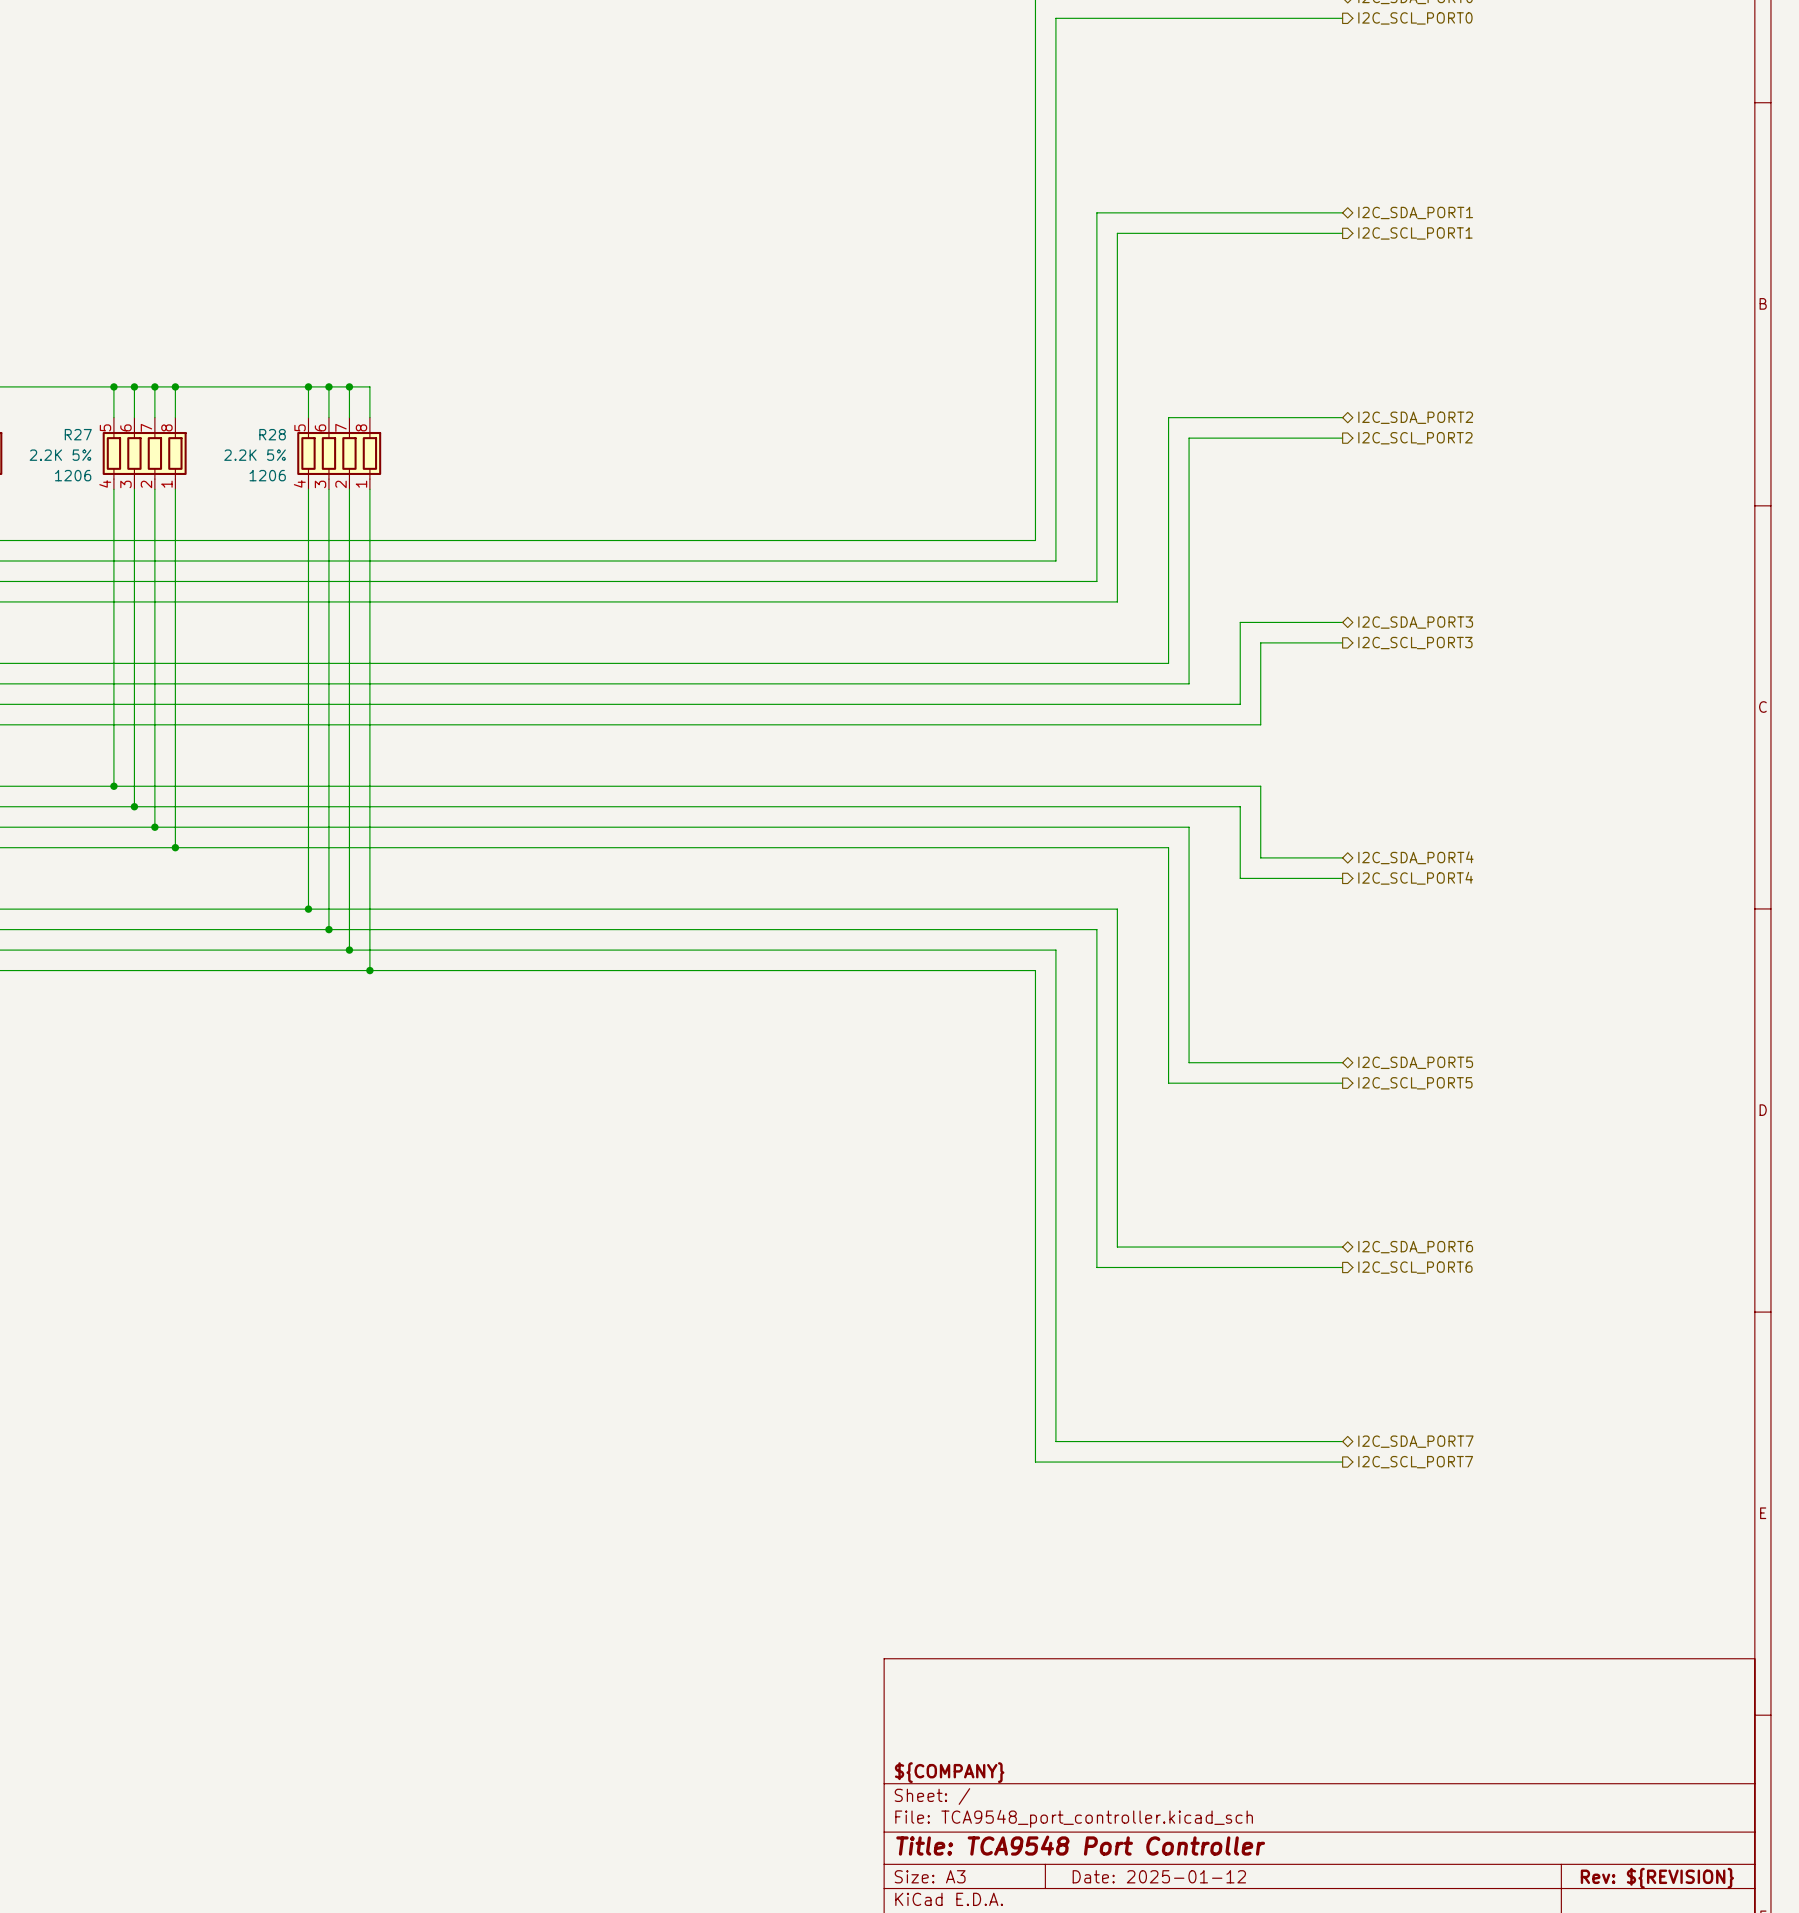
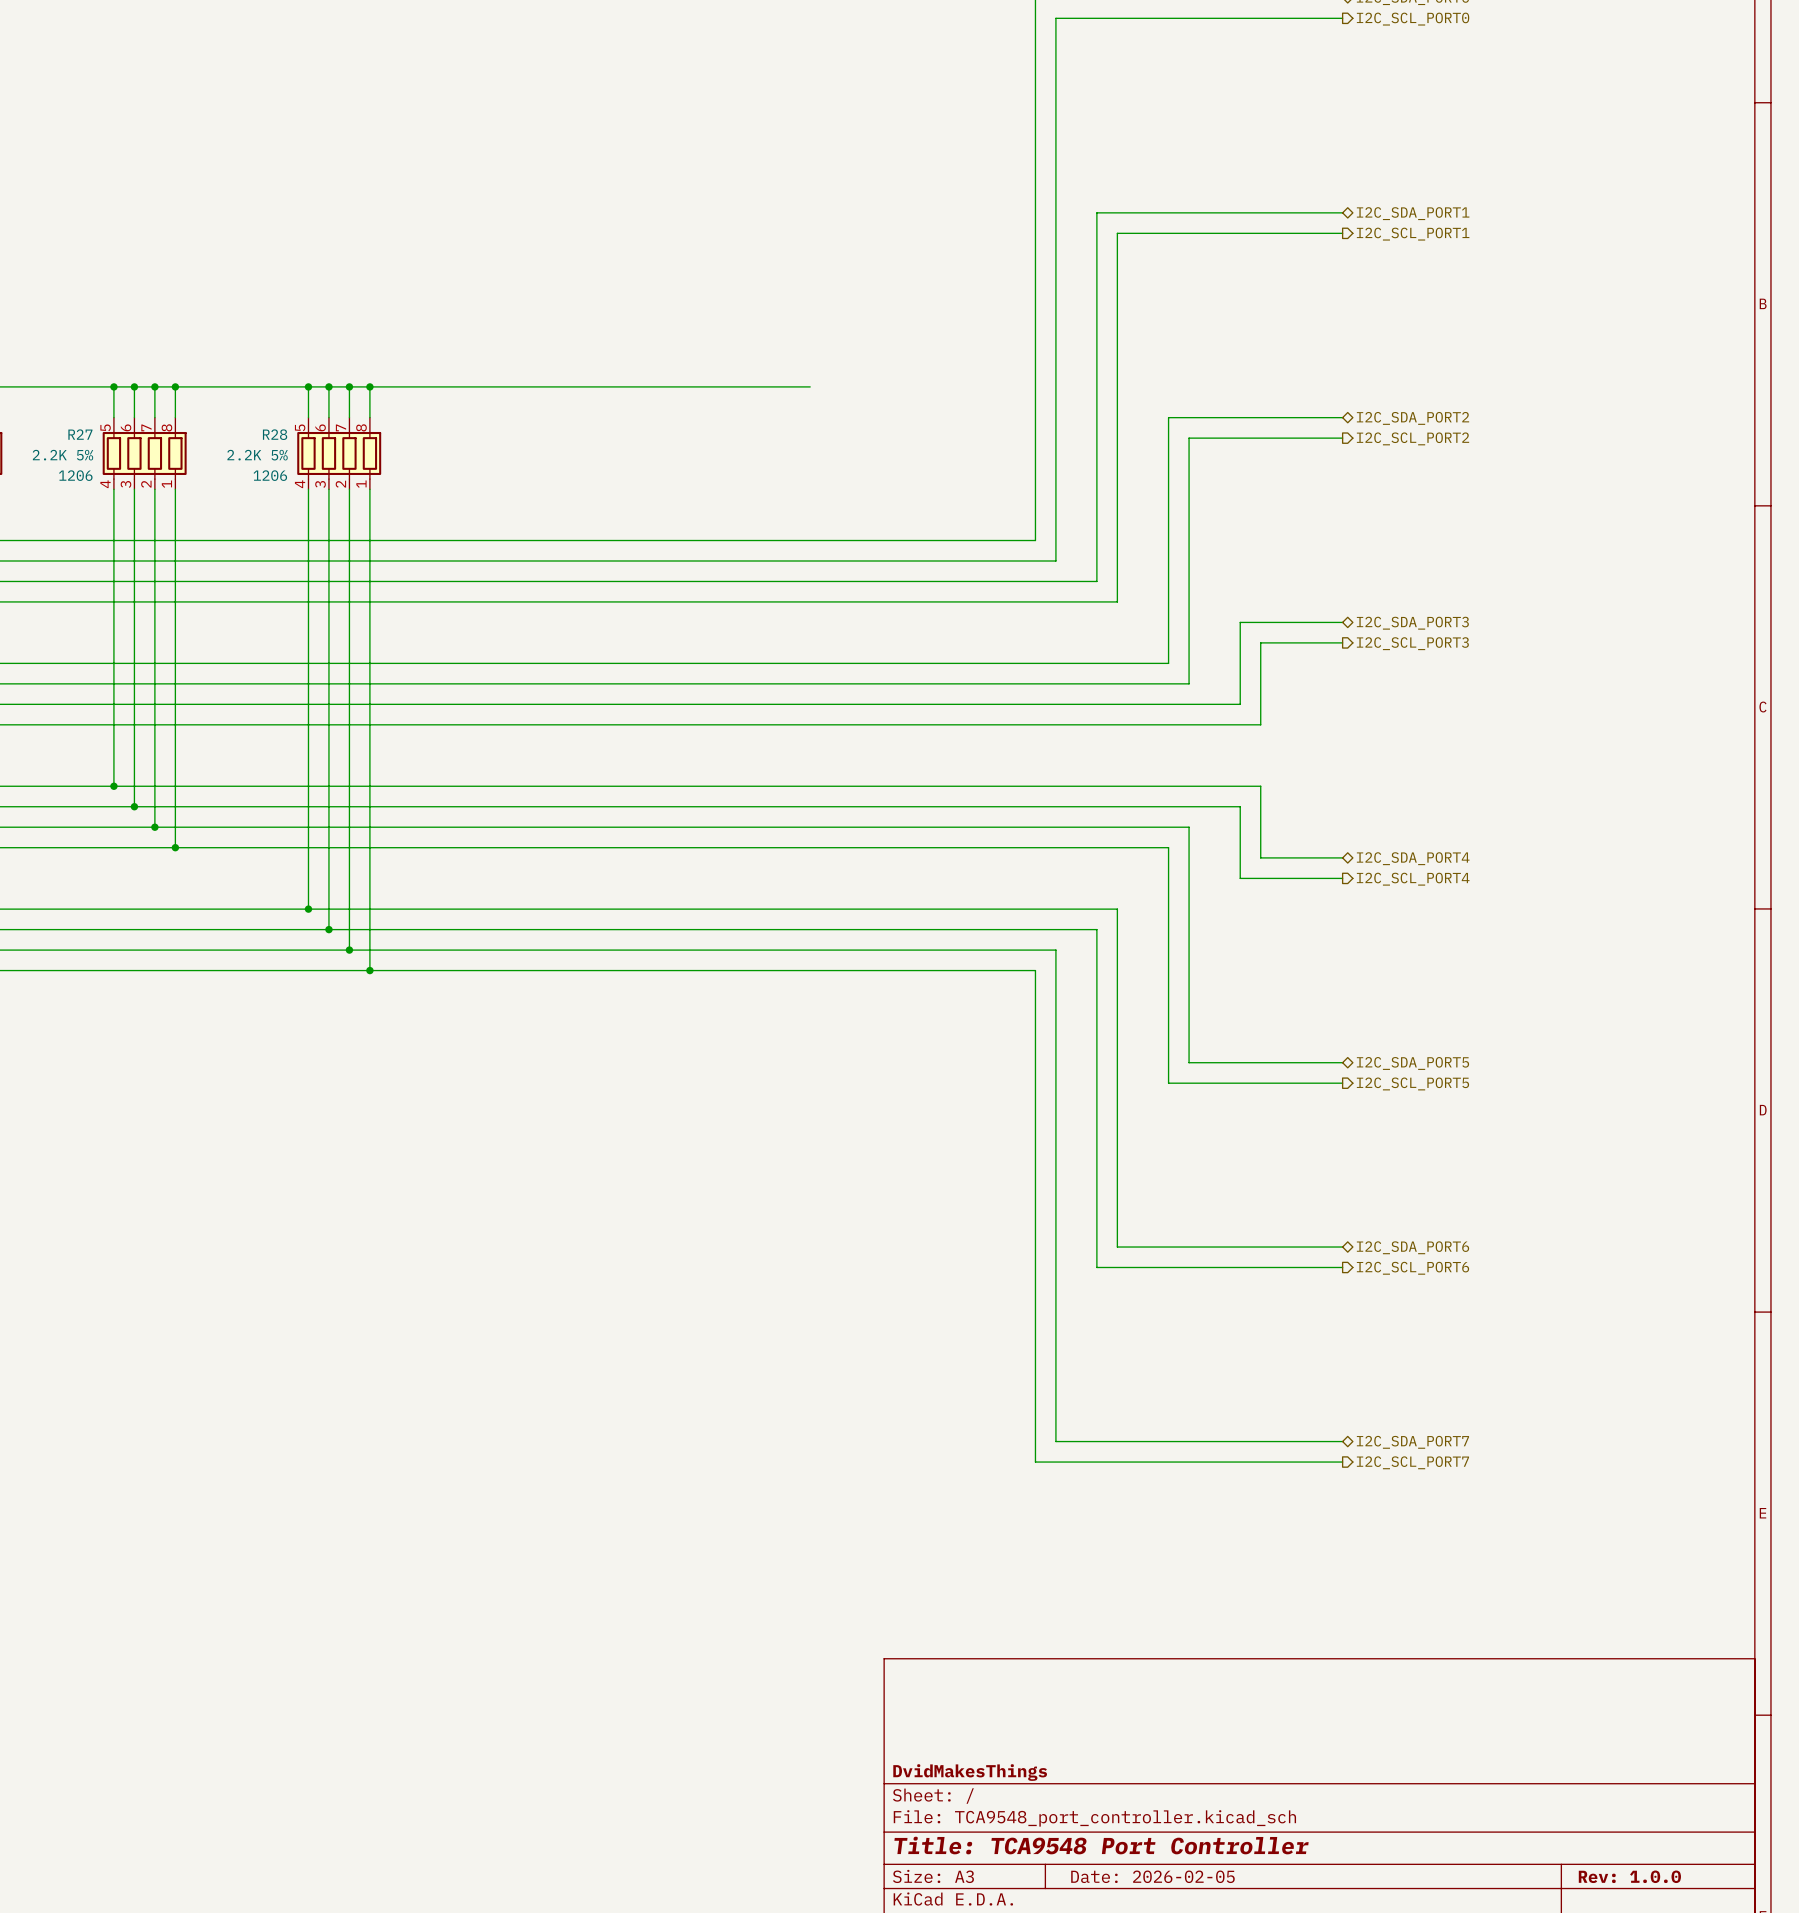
wire: none -> (369, 386) (810, 386)
junction: none -> (369, 386)
title block: ${COMPANY} (949, 1772) -> DvidMakesThings (970, 1772)
title block: Date: 2025-01-12 (1159, 1876) -> Date: 2026-02-05 (1152, 1876)
title block: Rev: ${REVISION} (1657, 1878) -> Rev: 1.0.0 (1629, 1876)

